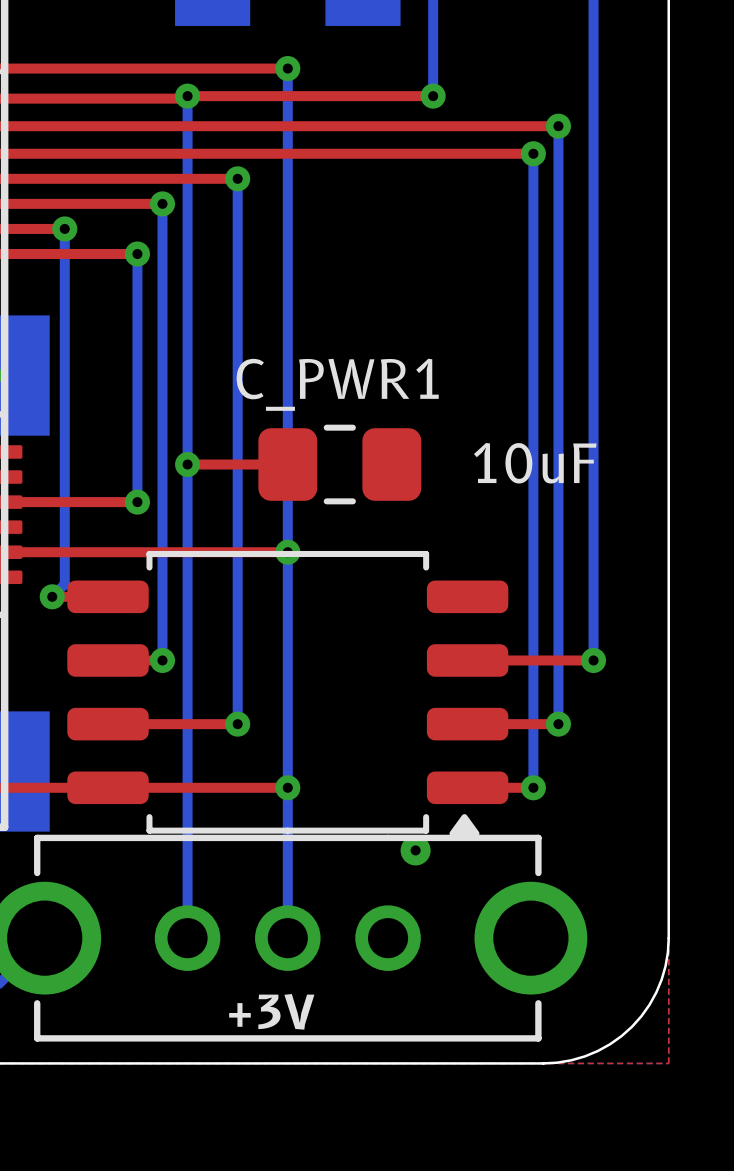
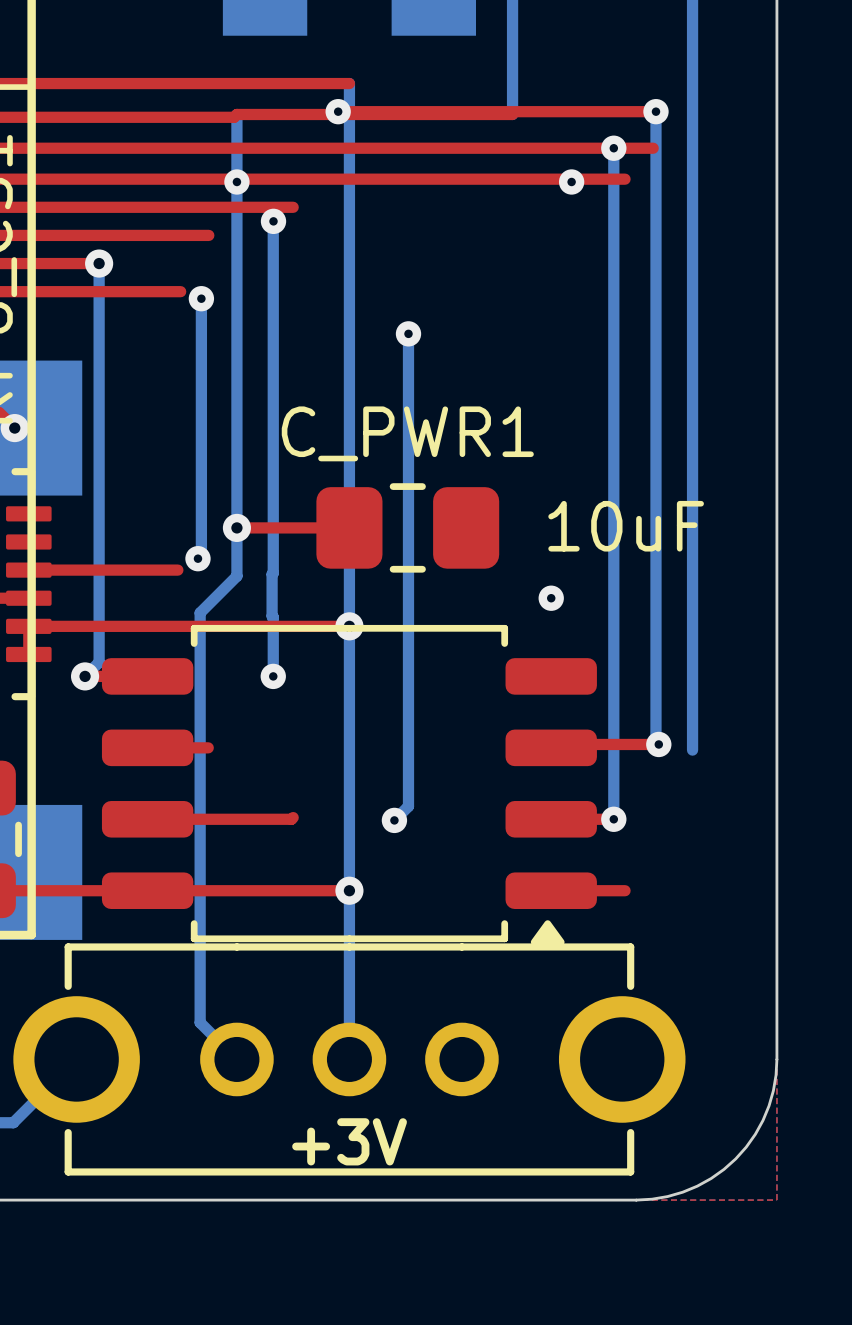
via: (287, 68) -> none
top track: none -> (338, 111) (644, 111)
via: none -> (338, 111)
via: none -> (655, 111)
via: (187, 96) -> none
via: (433, 96) -> none
bottom track: none -> (655, 122) (655, 741) (658, 744)
via: none -> (613, 148)
bottom track: (558, 126) (558, 722) -> (613, 151) (613, 819)
via: (558, 126) -> none
bottom track: (533, 153) (533, 787) -> none
via: (533, 153) -> none
via: none -> (236, 181)
via: none -> (571, 181)
bottom track: (237, 178) (237, 722) -> none
via position: (237, 178) -> (273, 221)
bottom track: none -> (273, 221) (273, 667)
bottom track: (162, 203) (162, 659) -> none
via: (162, 203) -> none
bottom track: (137, 254) (137, 499) -> none
via position: (137, 254) -> (201, 298)
bottom track: none -> (201, 298) (201, 555) (197, 558)
bottom track: none -> (408, 333) (408, 806) (394, 820)
via: none -> (408, 333)
via position: (137, 502) -> (197, 558)
bottom track: (187, 507) (187, 938) -> (236, 576) (200, 612) (200, 1022) (236, 1059)
via: none -> (551, 598)
via: none -> (273, 676)
via: none -> (658, 744)
via: (162, 660) -> none
top track: (467, 660) (591, 660) (593, 662) -> (551, 747) (554, 744) (658, 744)
via: (593, 660) -> none
top track: (558, 722) (523, 724) -> none
via: (237, 724) -> none
via: none -> (613, 819)
via: (558, 724) -> none
via: none -> (394, 820)
via: (533, 787) -> none
via: (415, 850) -> none

